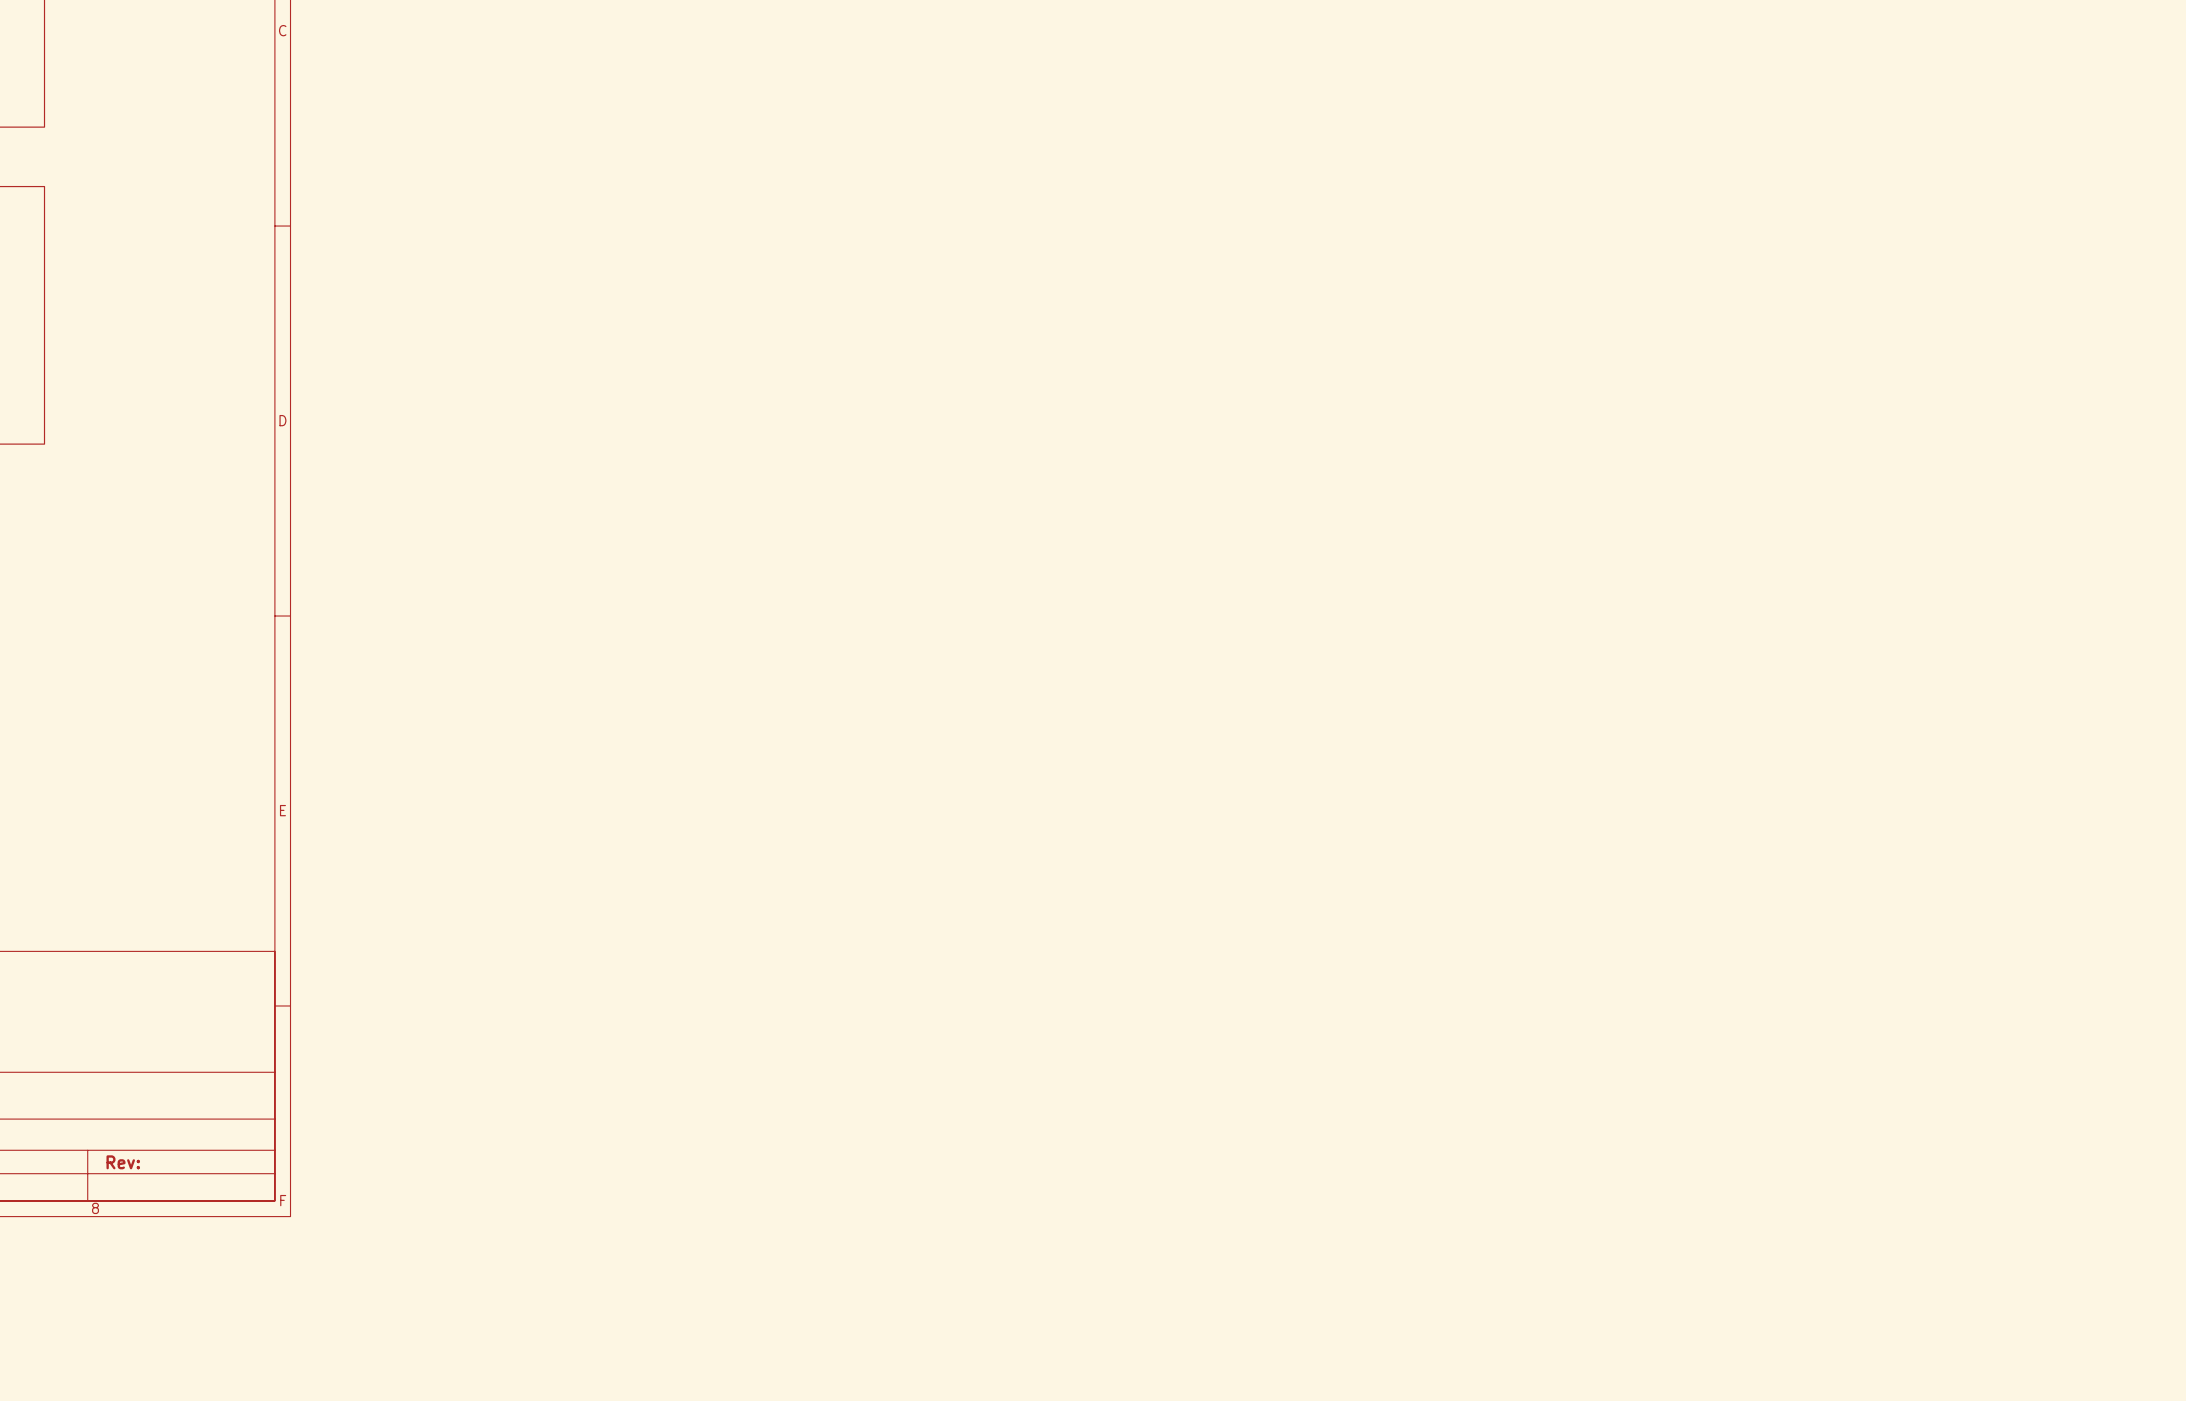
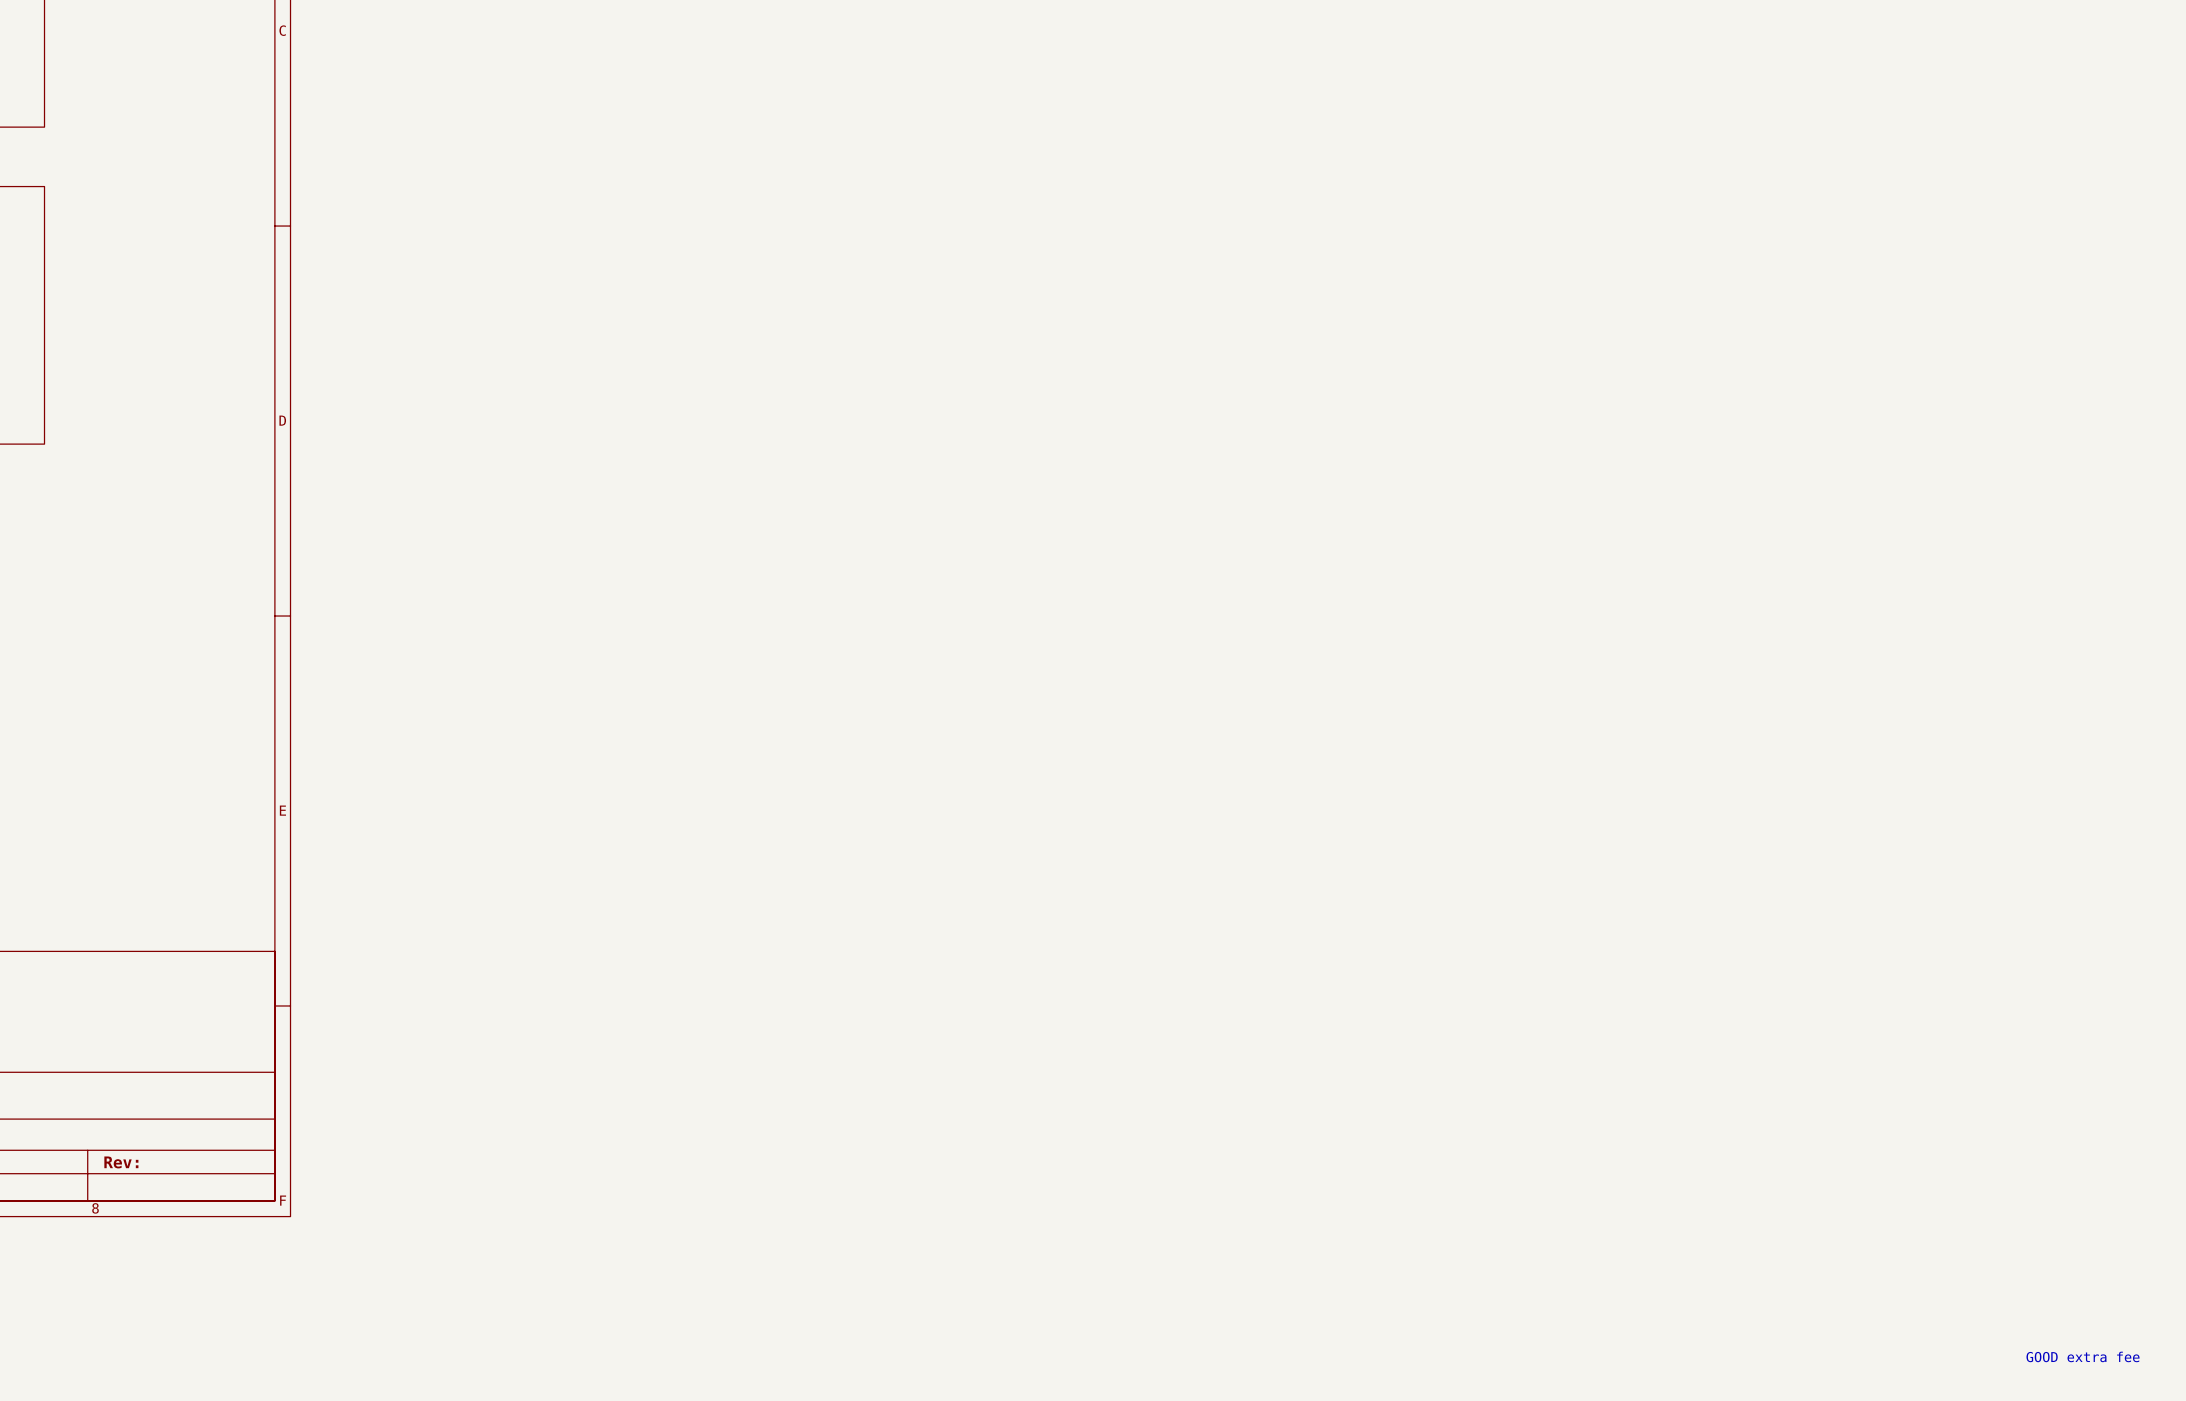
text: none -> GOOD extra fee (2083, 1356)

